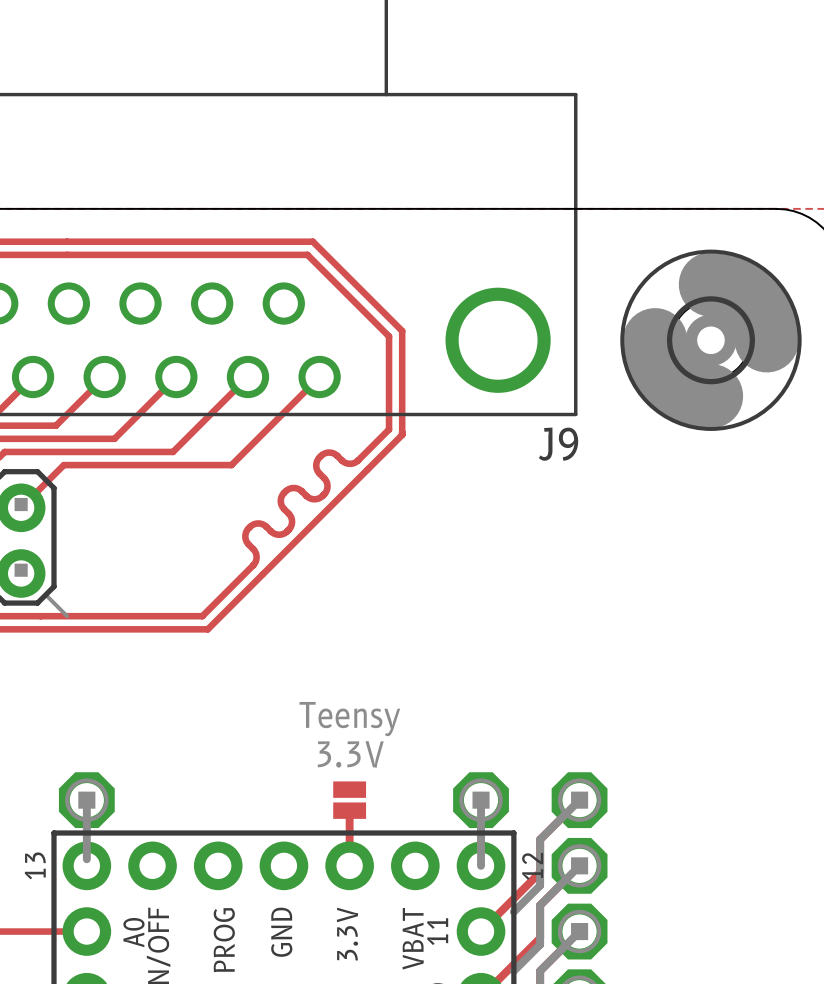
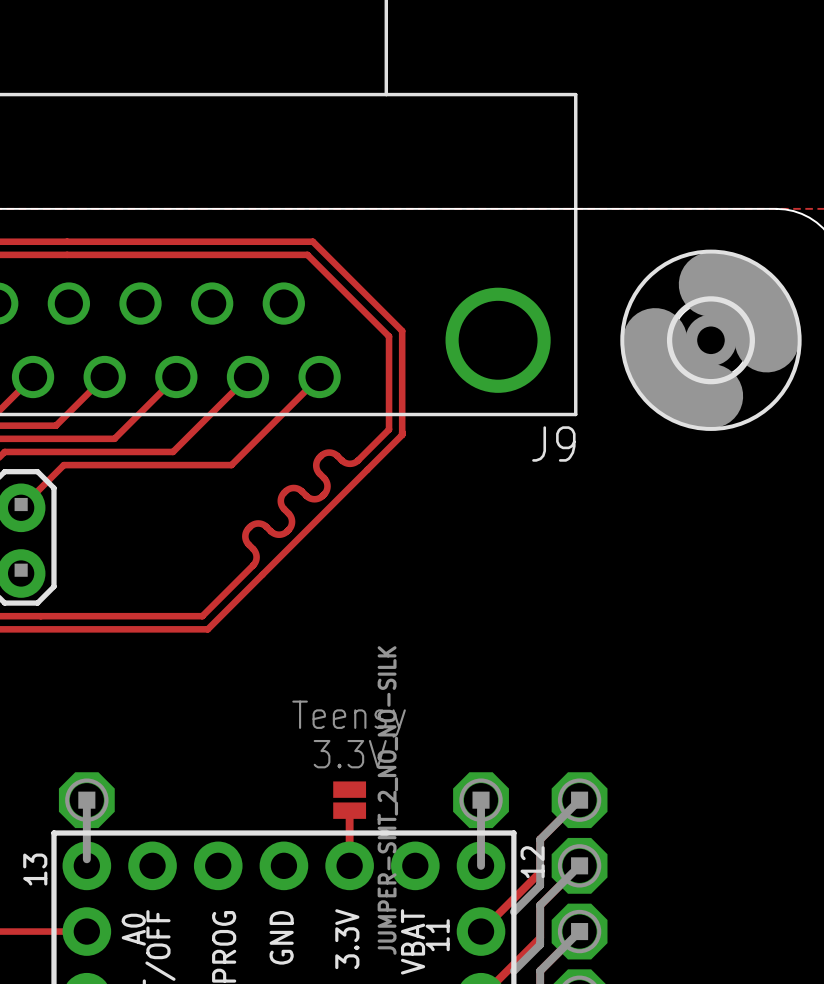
line: (44, 595) (67, 616) -> none
part value: none -> JUMPER-SMT_2_NO_NO-SILK (387, 800)

